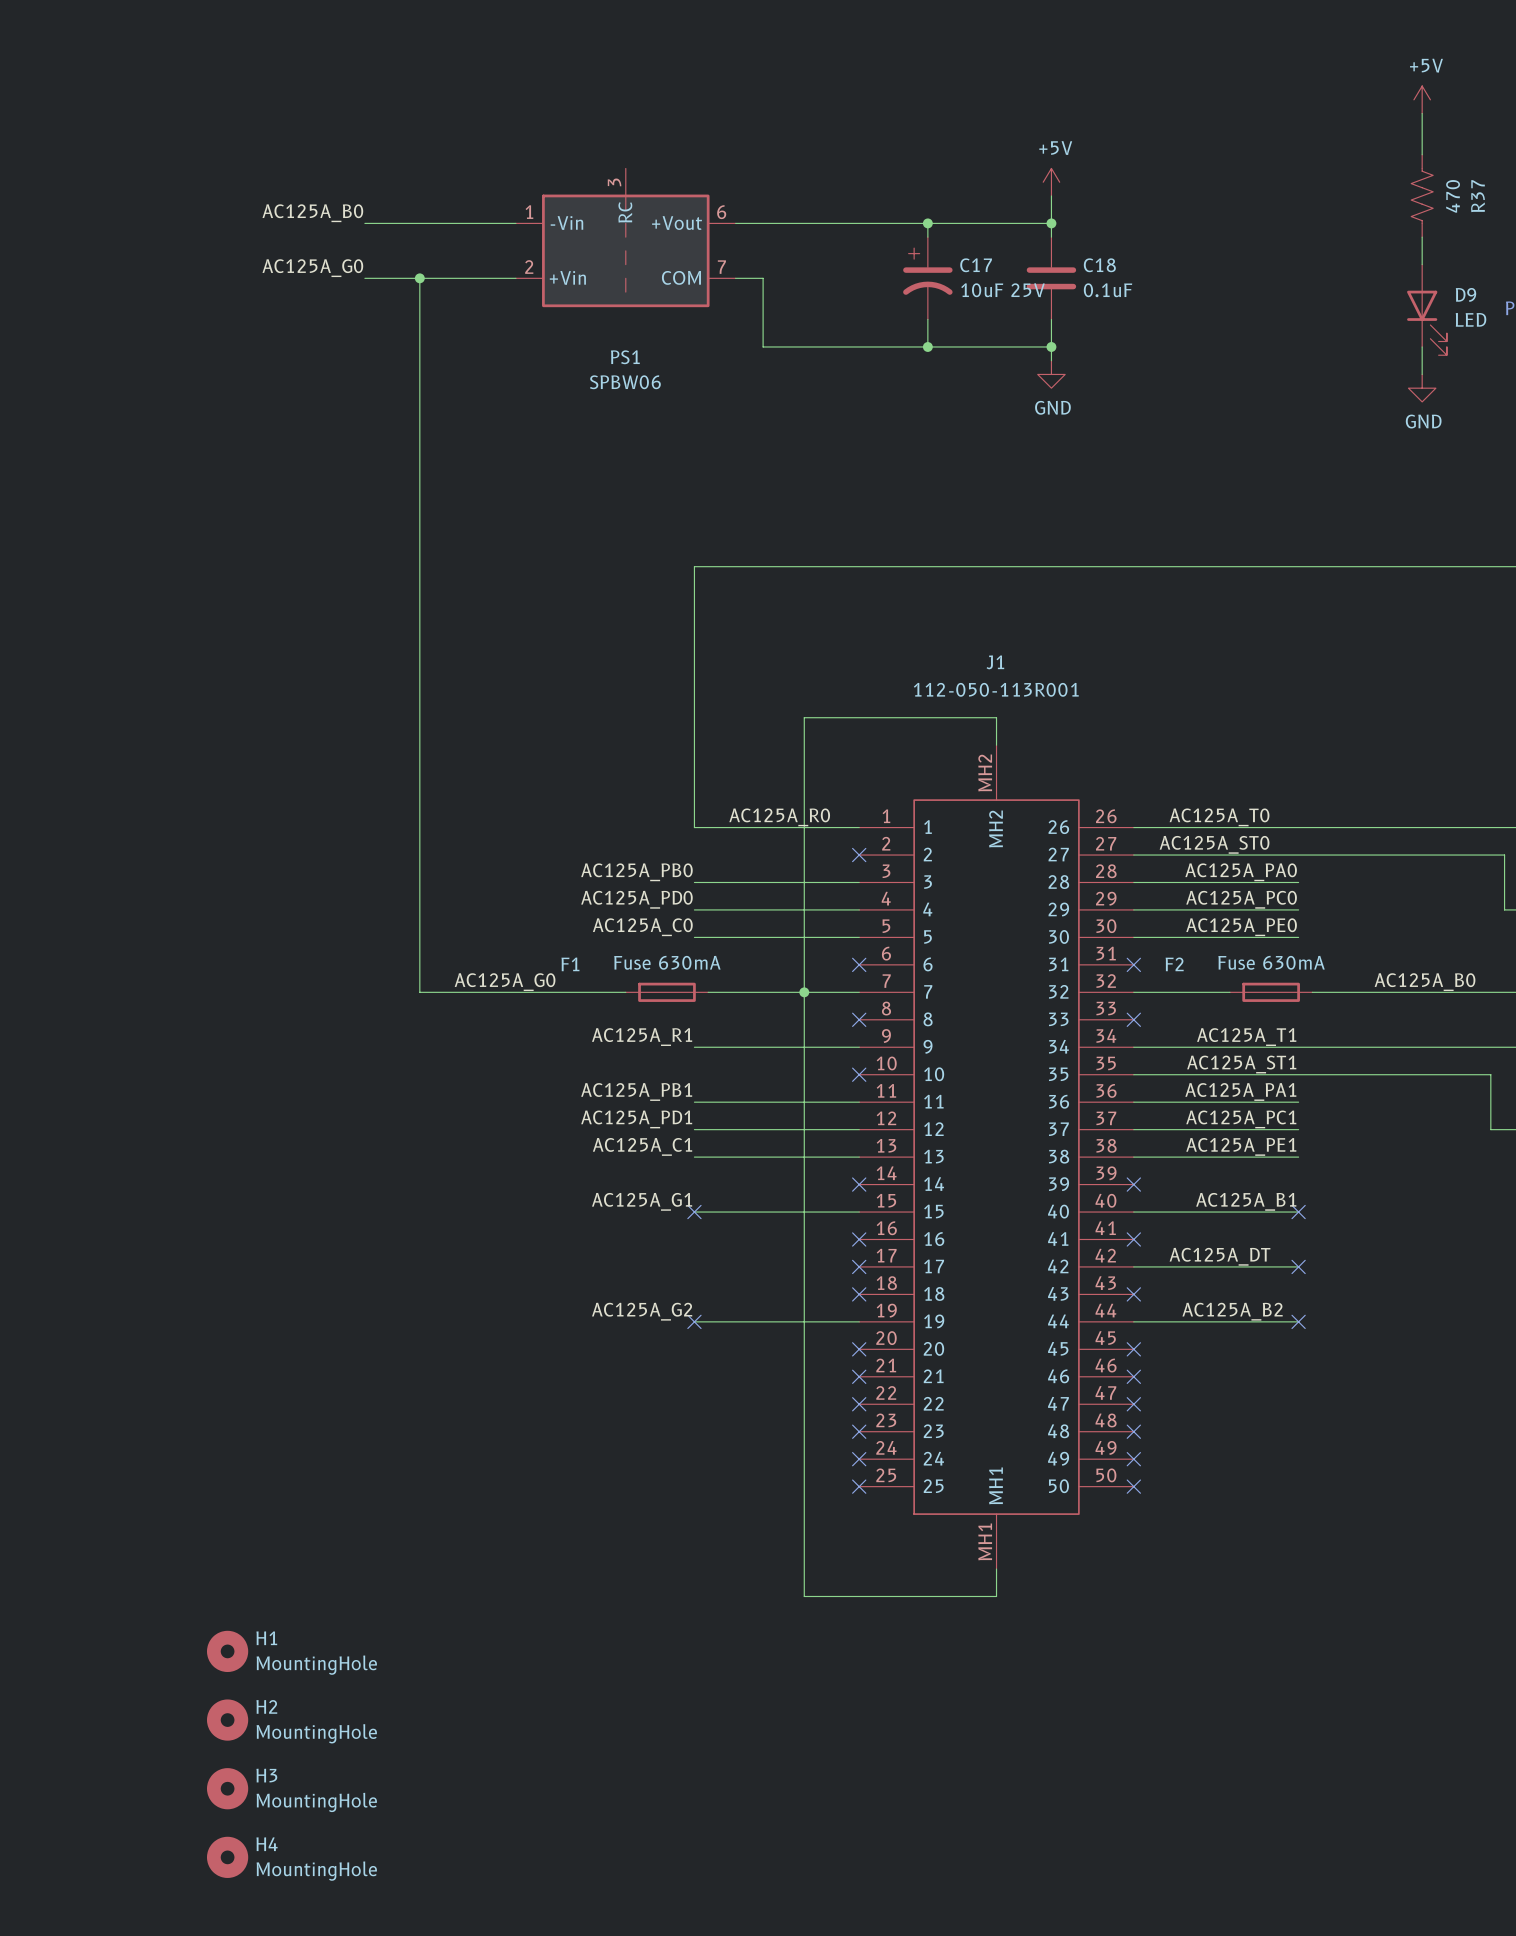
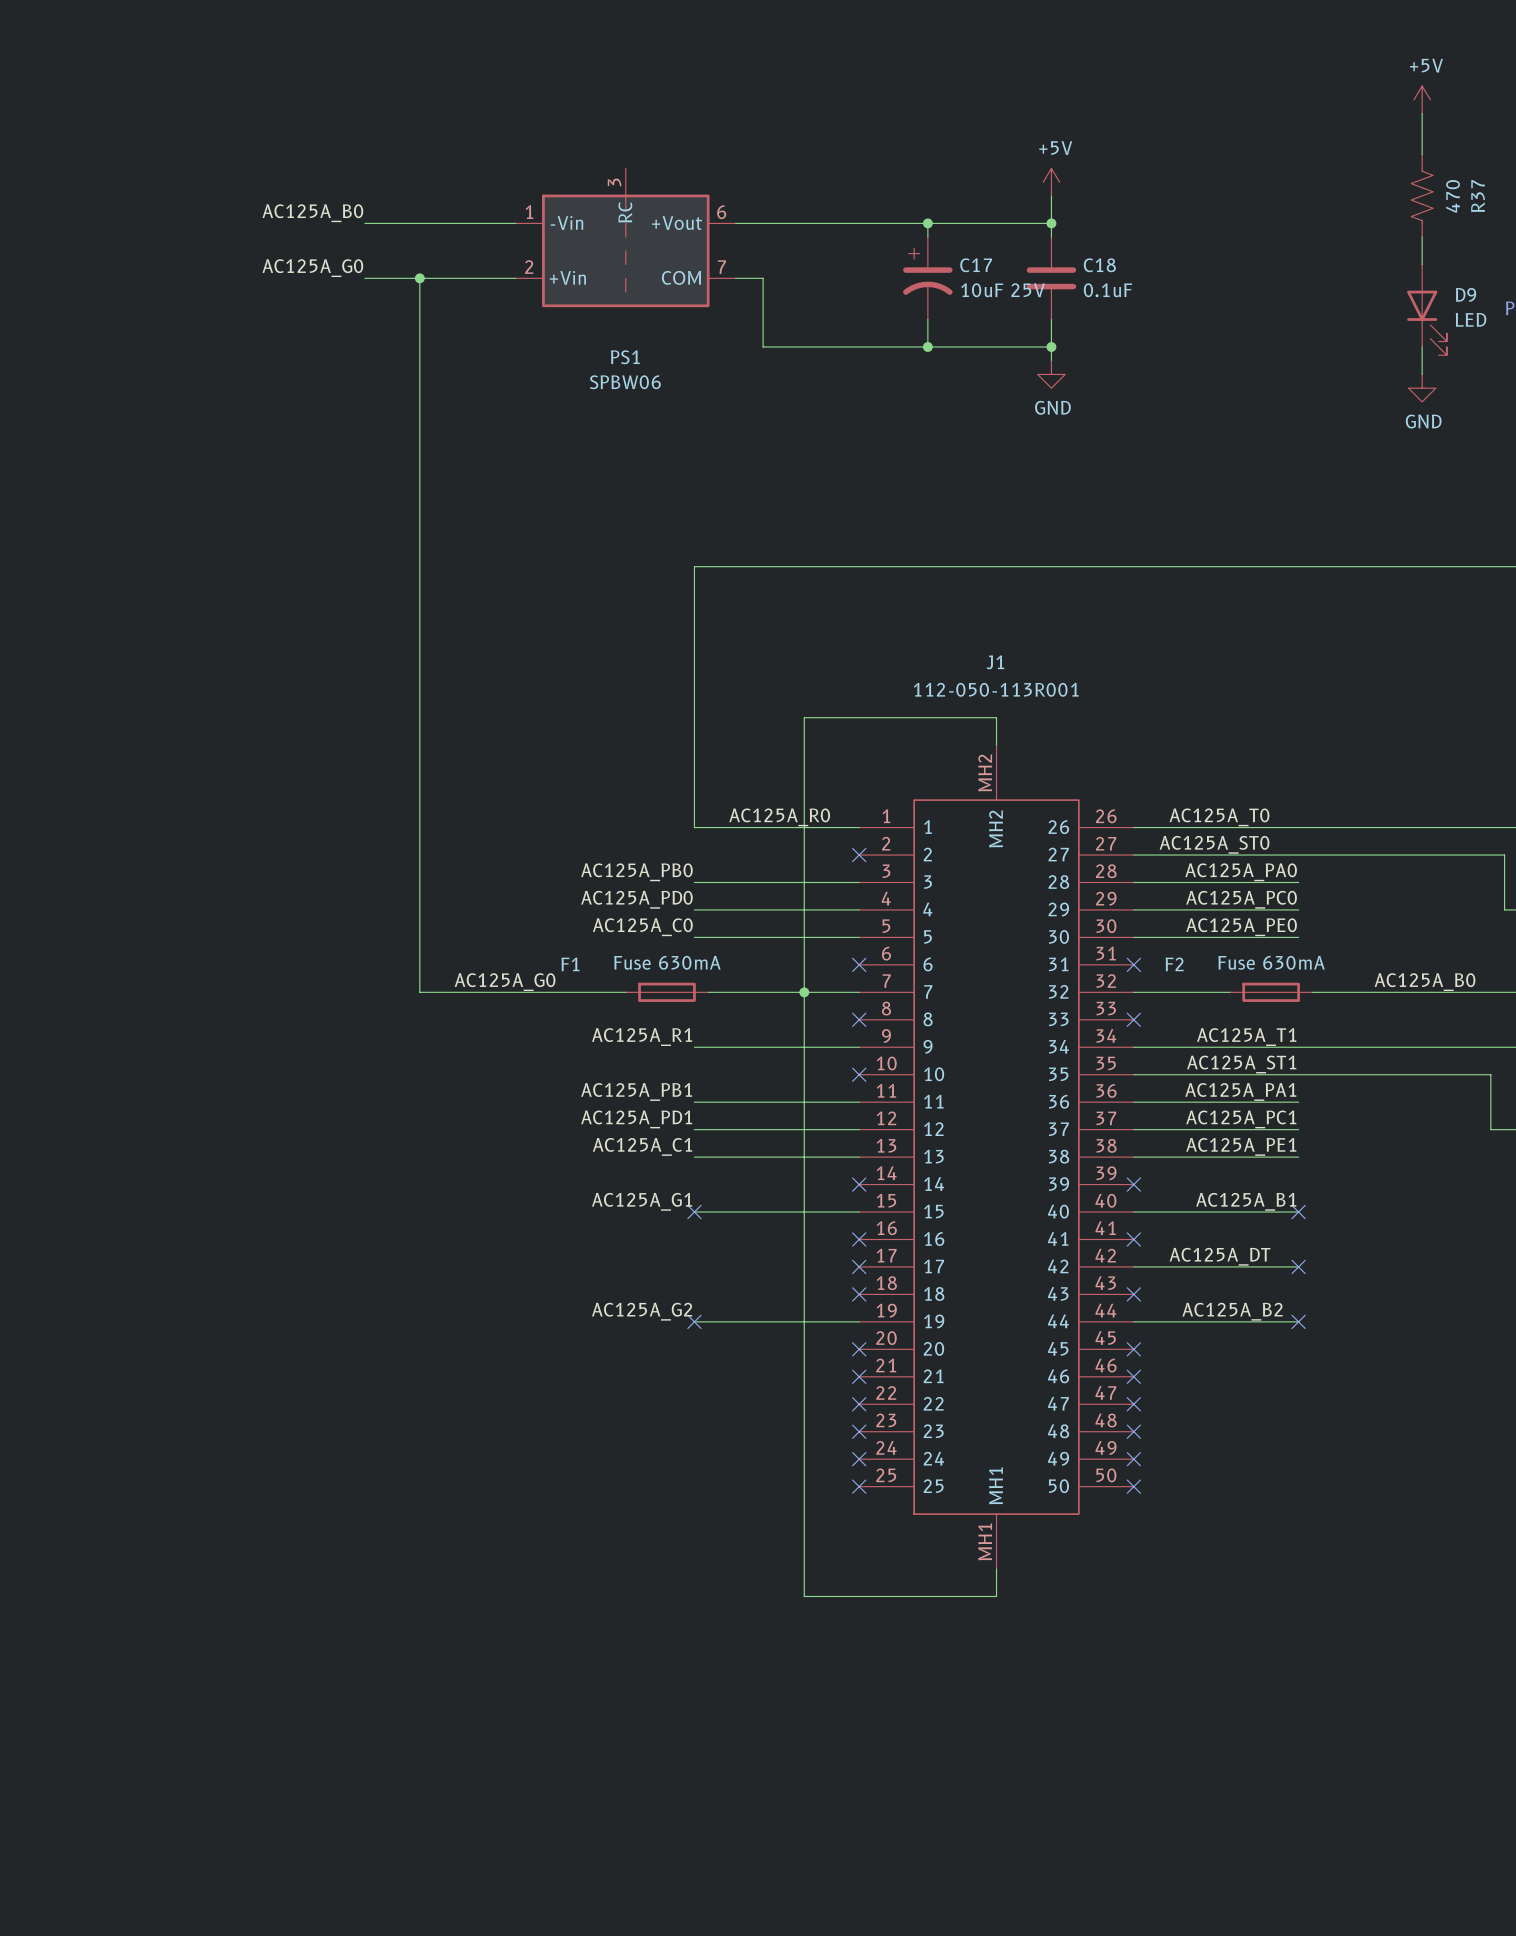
H1: MountingHole (227, 1651) -> none
H2: MountingHole (227, 1720) -> none
H3: MountingHole (227, 1788) -> none
H4: MountingHole (227, 1857) -> none

